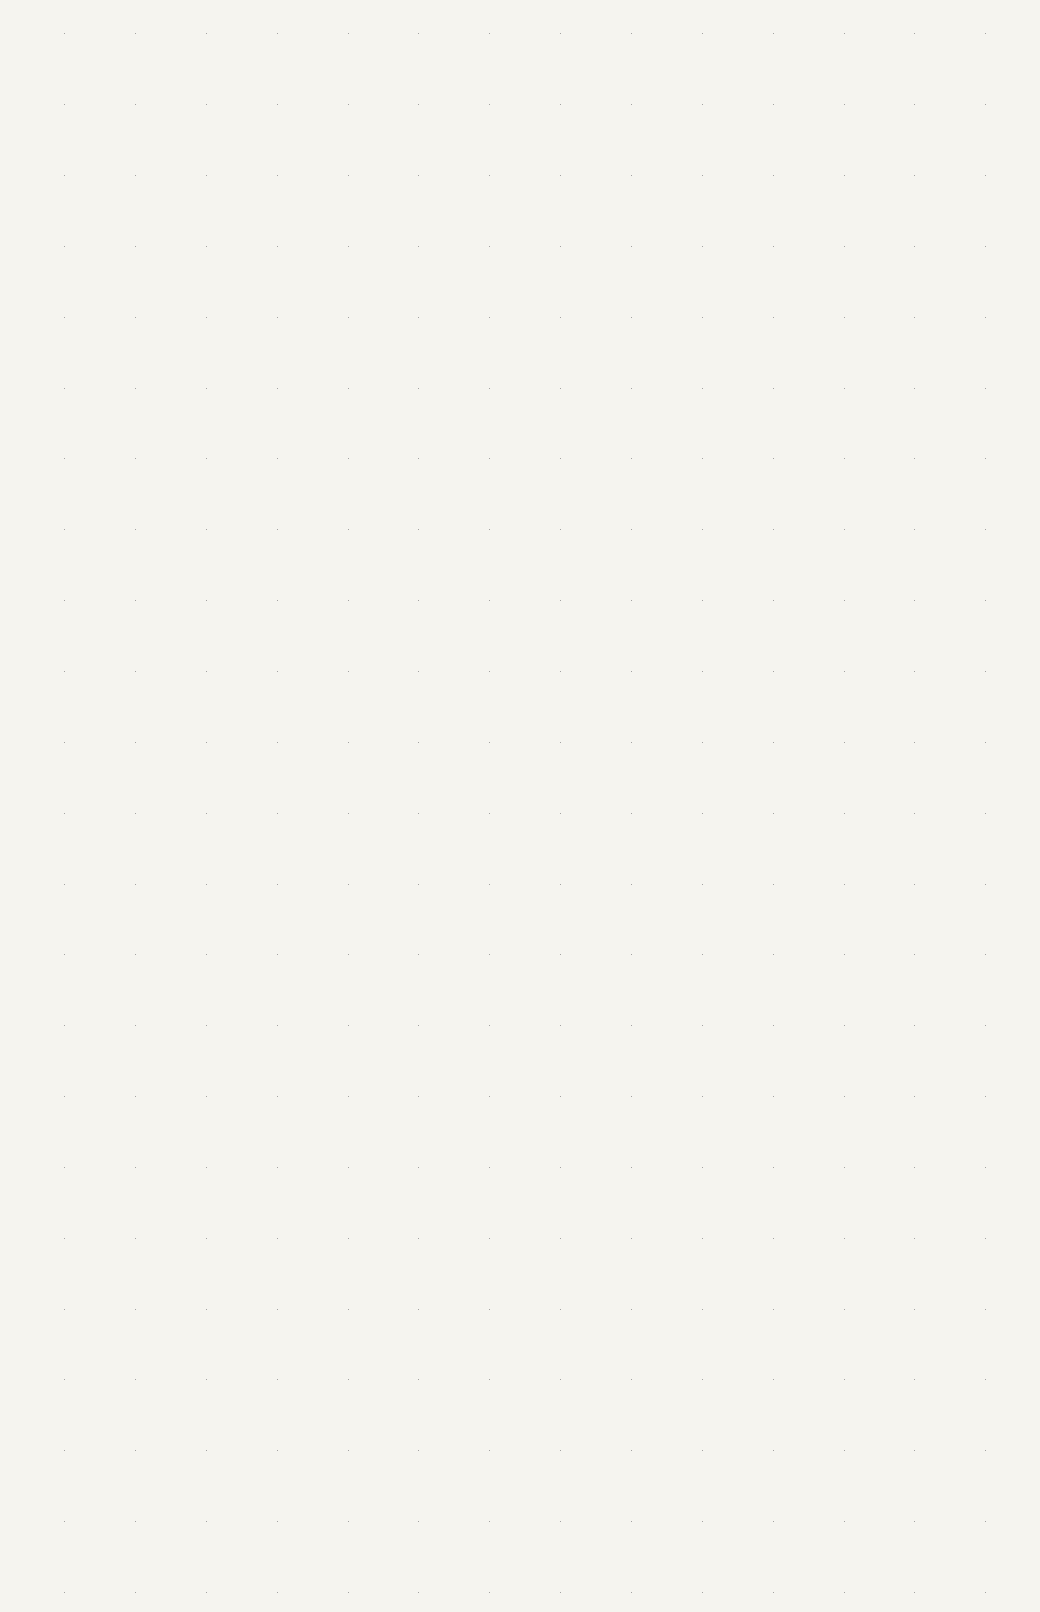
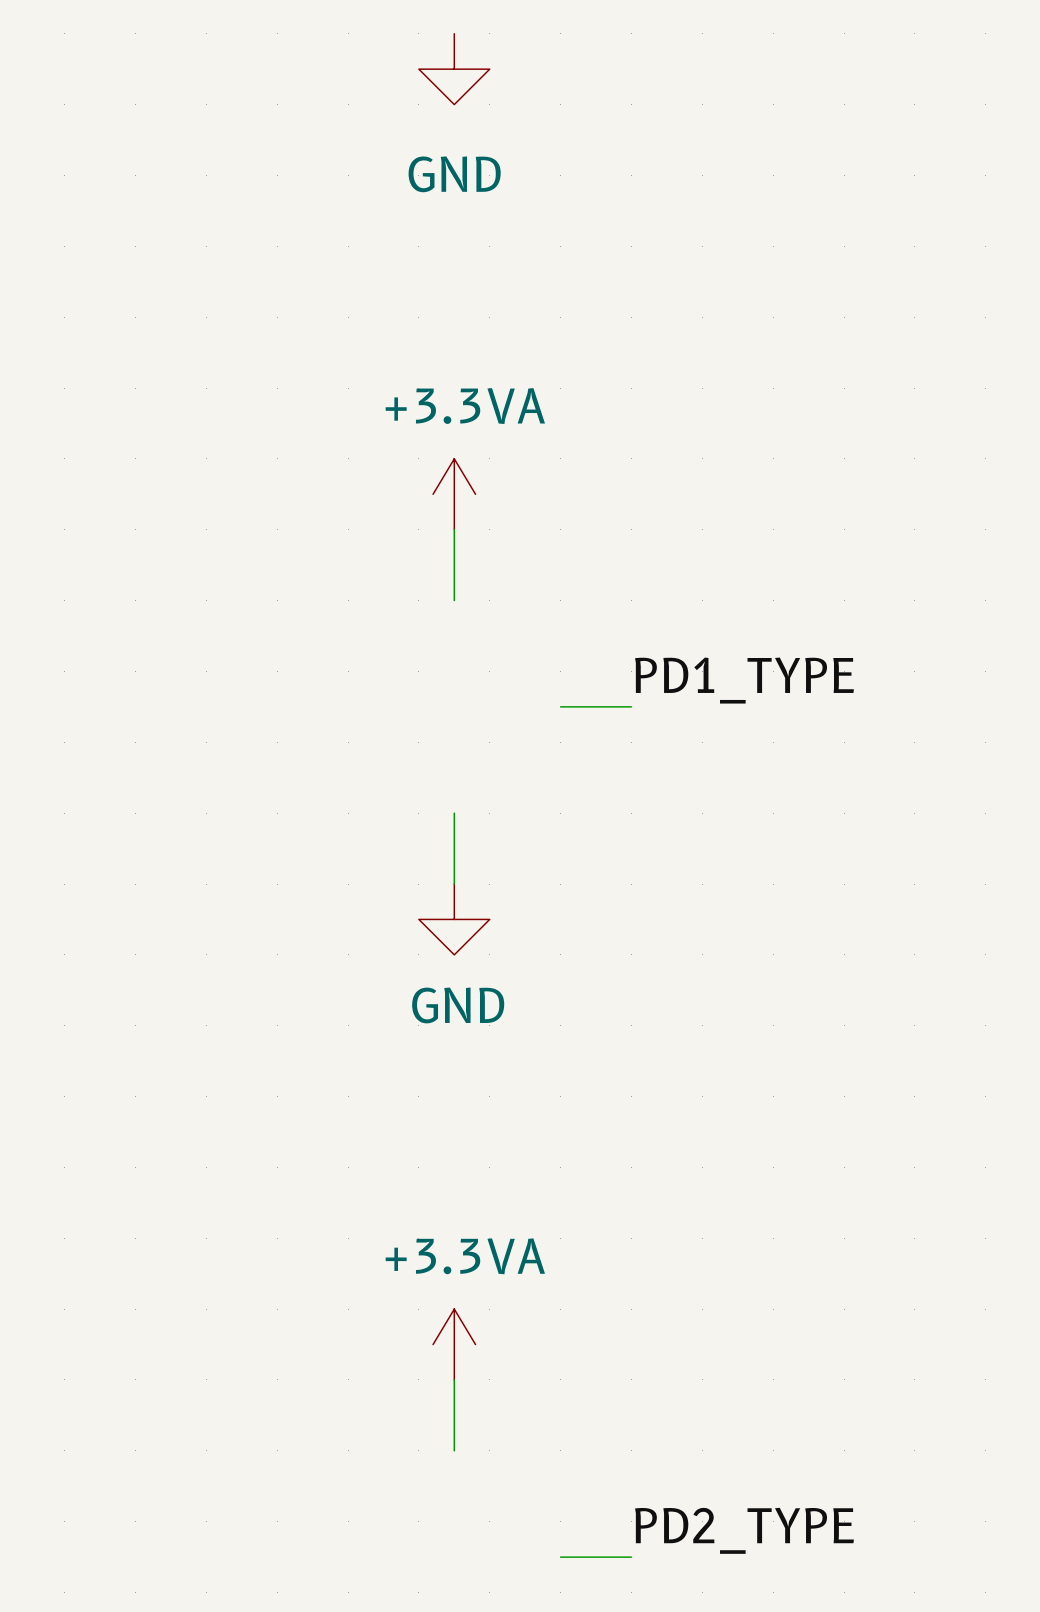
power symbol: none -> GND (454, 69)
power symbol: none -> +3.3VA (454, 494)
wire: none -> (454, 529) (454, 600)
label: none -> PD1_TYPE (744, 680)
wire: none -> (560, 706) (631, 706)
wire: none -> (454, 813) (454, 884)
power symbol: none -> GND (454, 919)
power symbol: none -> +3.3VA (454, 1344)
wire: none -> (454, 1379) (454, 1450)
label: none -> PD2_TYPE (744, 1530)
wire: none -> (560, 1557) (631, 1557)

